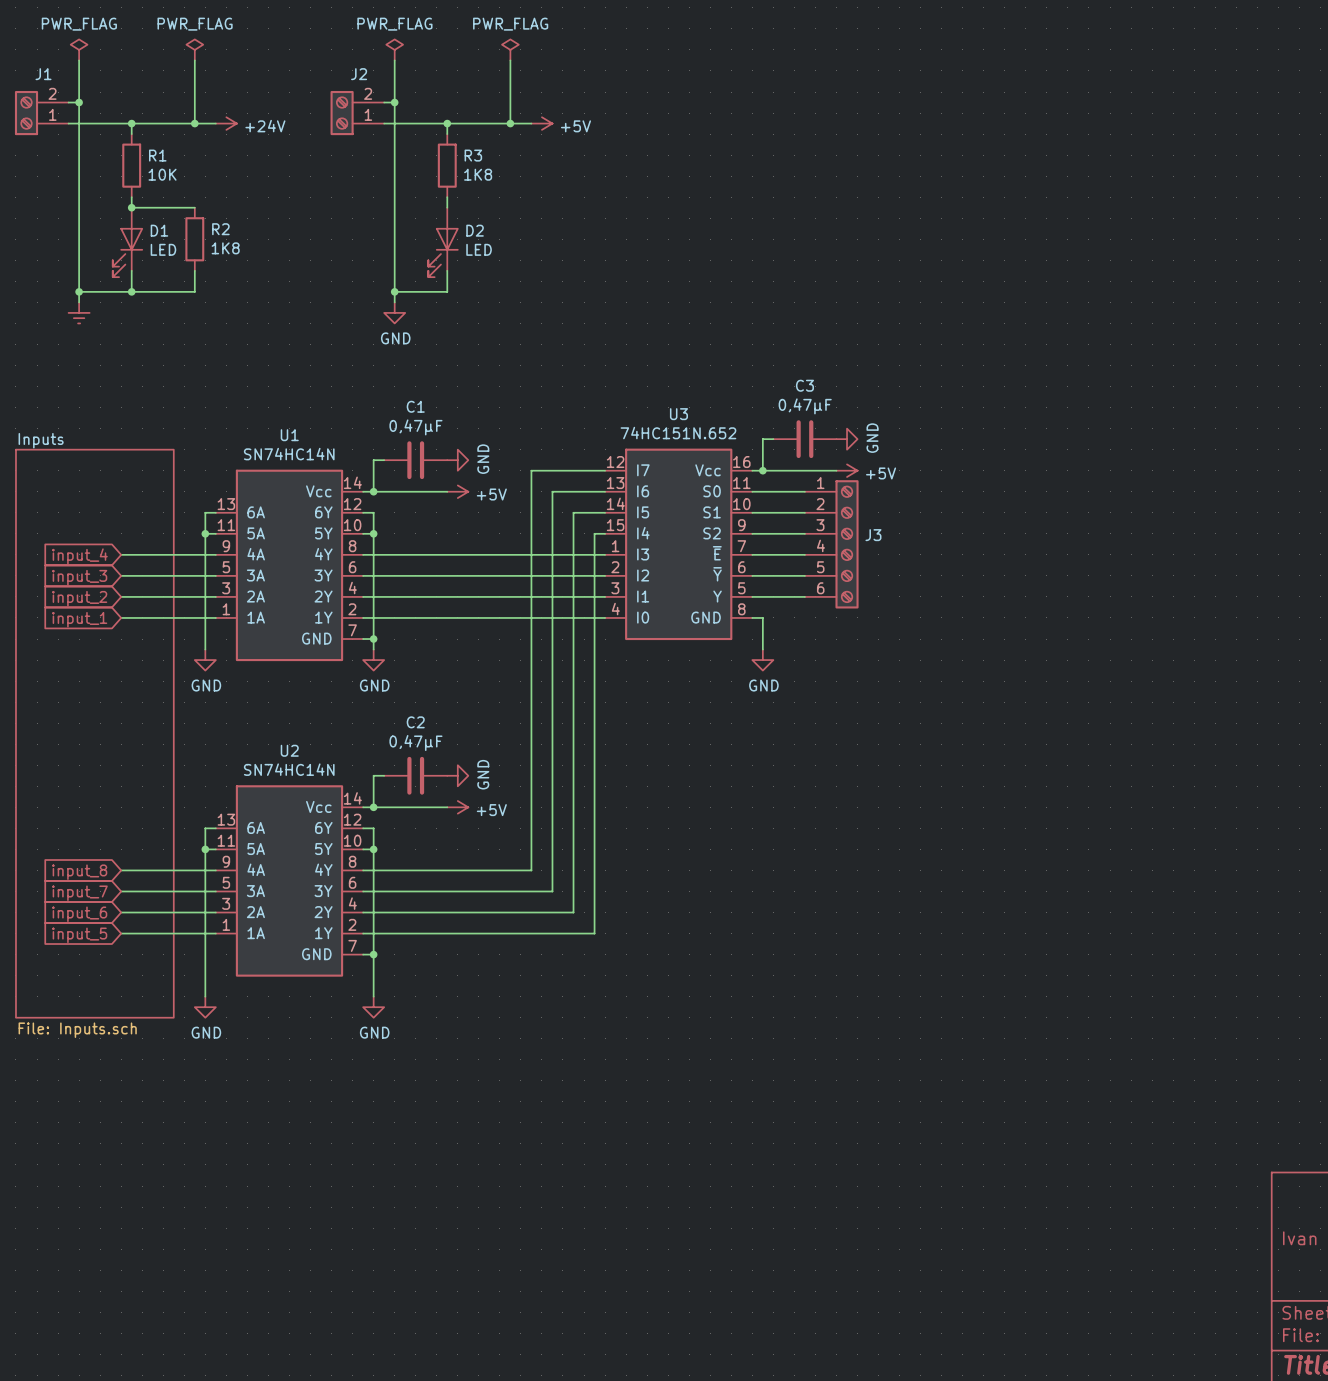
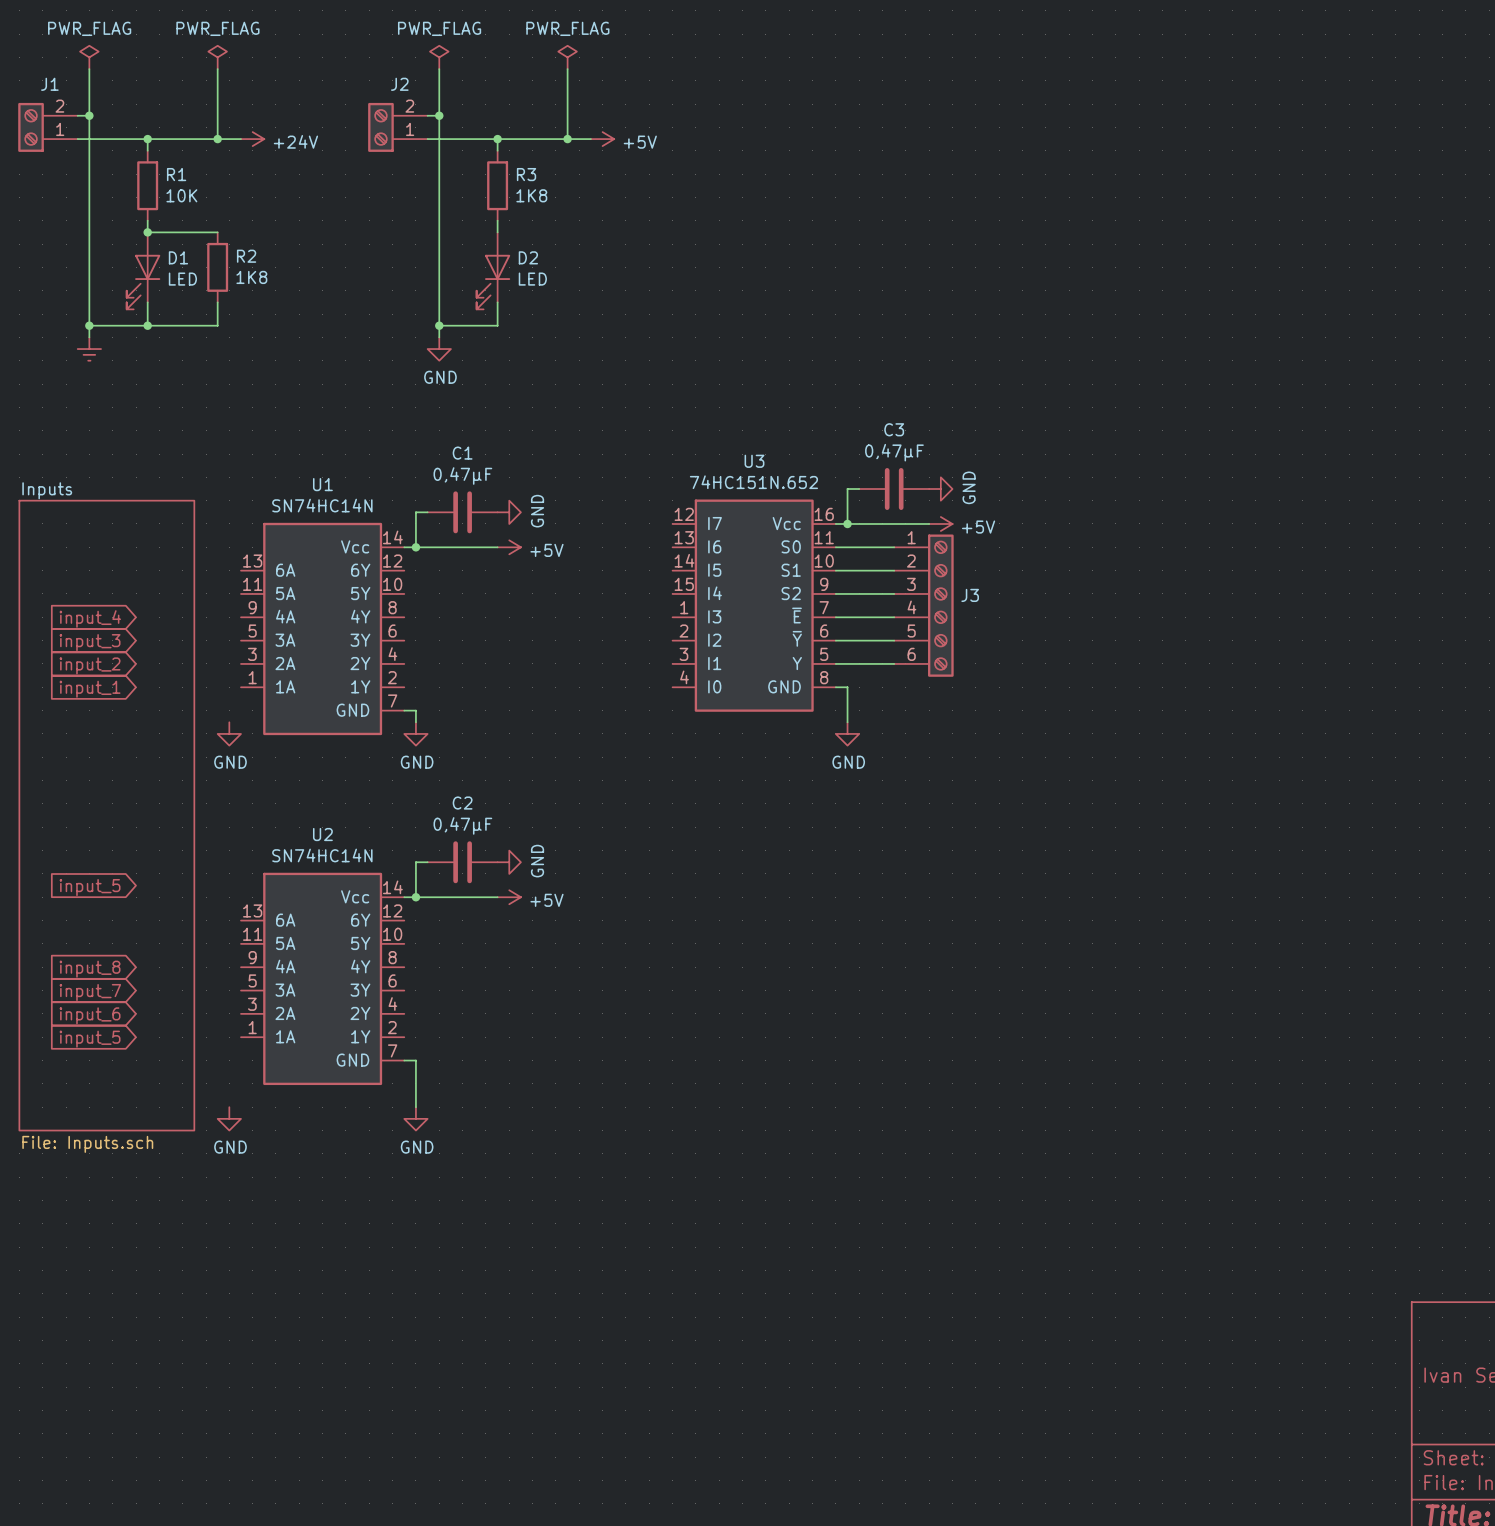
wire: (605, 470) (531, 470) (531, 870) (363, 870) -> none
wire: (605, 491) (552, 491) (552, 891) (363, 891) -> none
wire: (215, 512) (205, 512) (205, 649) -> none
wire: (363, 512) (373, 512) (373, 639) -> none
wire: (605, 512) (573, 512) (573, 912) (363, 912) -> none
wire: (205, 533) (215, 533) -> none
junction: (205, 533) -> none
wire: (363, 533) (373, 533) -> none
junction: (373, 533) -> none
wire: (605, 533) (594, 533) (594, 933) (363, 933) -> none
wire: (121, 554) (215, 554) -> none
wire: (363, 554) (605, 554) -> none
wire: (121, 575) (215, 575) -> none
wire: (363, 575) (605, 575) -> none
wire: (121, 596) (215, 596) -> none
wire: (363, 596) (605, 596) -> none
wire: (121, 617) (215, 617) -> none
wire: (363, 617) (605, 617) -> none
junction: (373, 639) -> none
global label: none -> input_5 (90, 887)
wire: (215, 828) (205, 828) (205, 996) -> none
wire: (363, 828) (373, 828) (373, 954) -> none
wire: (205, 849) (215, 849) -> none
junction: (205, 849) -> none
wire: (363, 849) (373, 849) -> none
junction: (373, 849) -> none
wire: (121, 870) (215, 870) -> none
wire: (121, 891) (215, 891) -> none
wire: (121, 912) (215, 912) -> none
wire: (121, 933) (215, 933) -> none
junction: (373, 954) -> none

